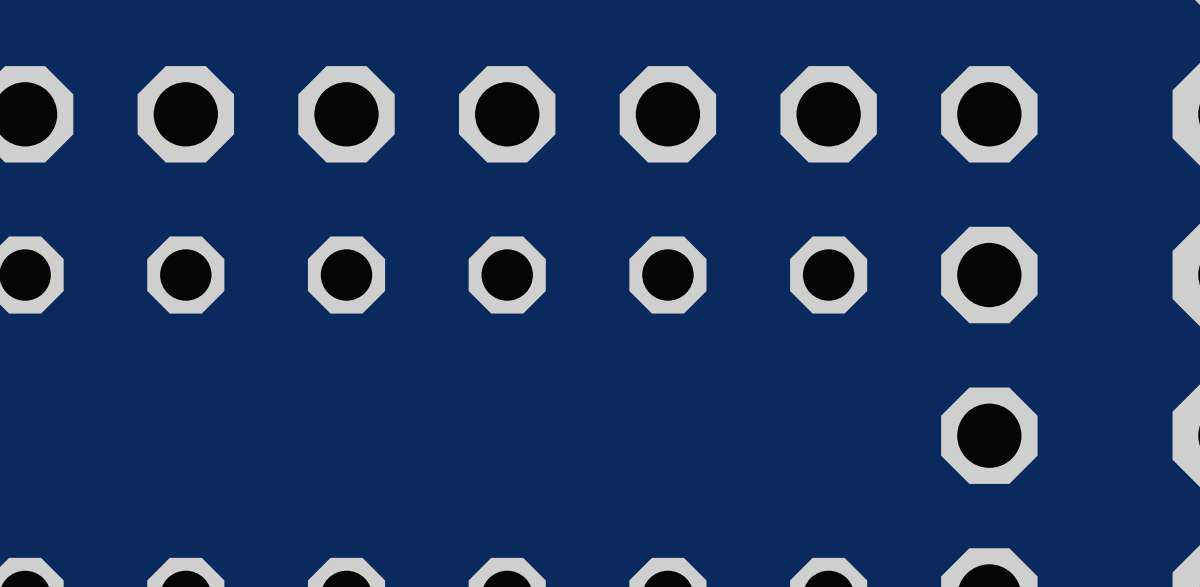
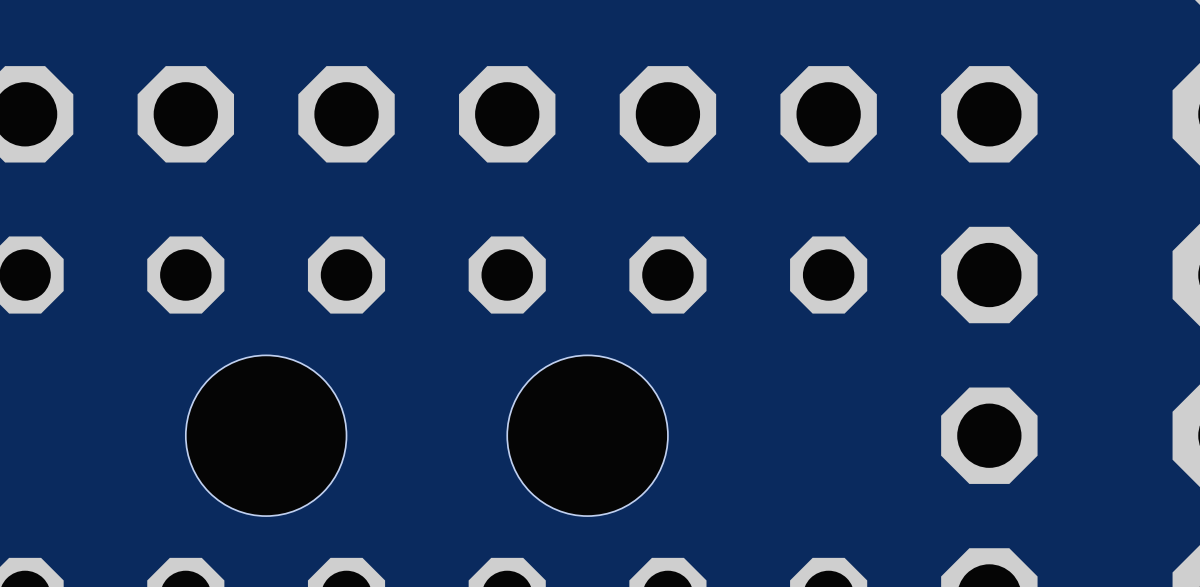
hole: none -> (266, 435)
hole: none -> (587, 435)

